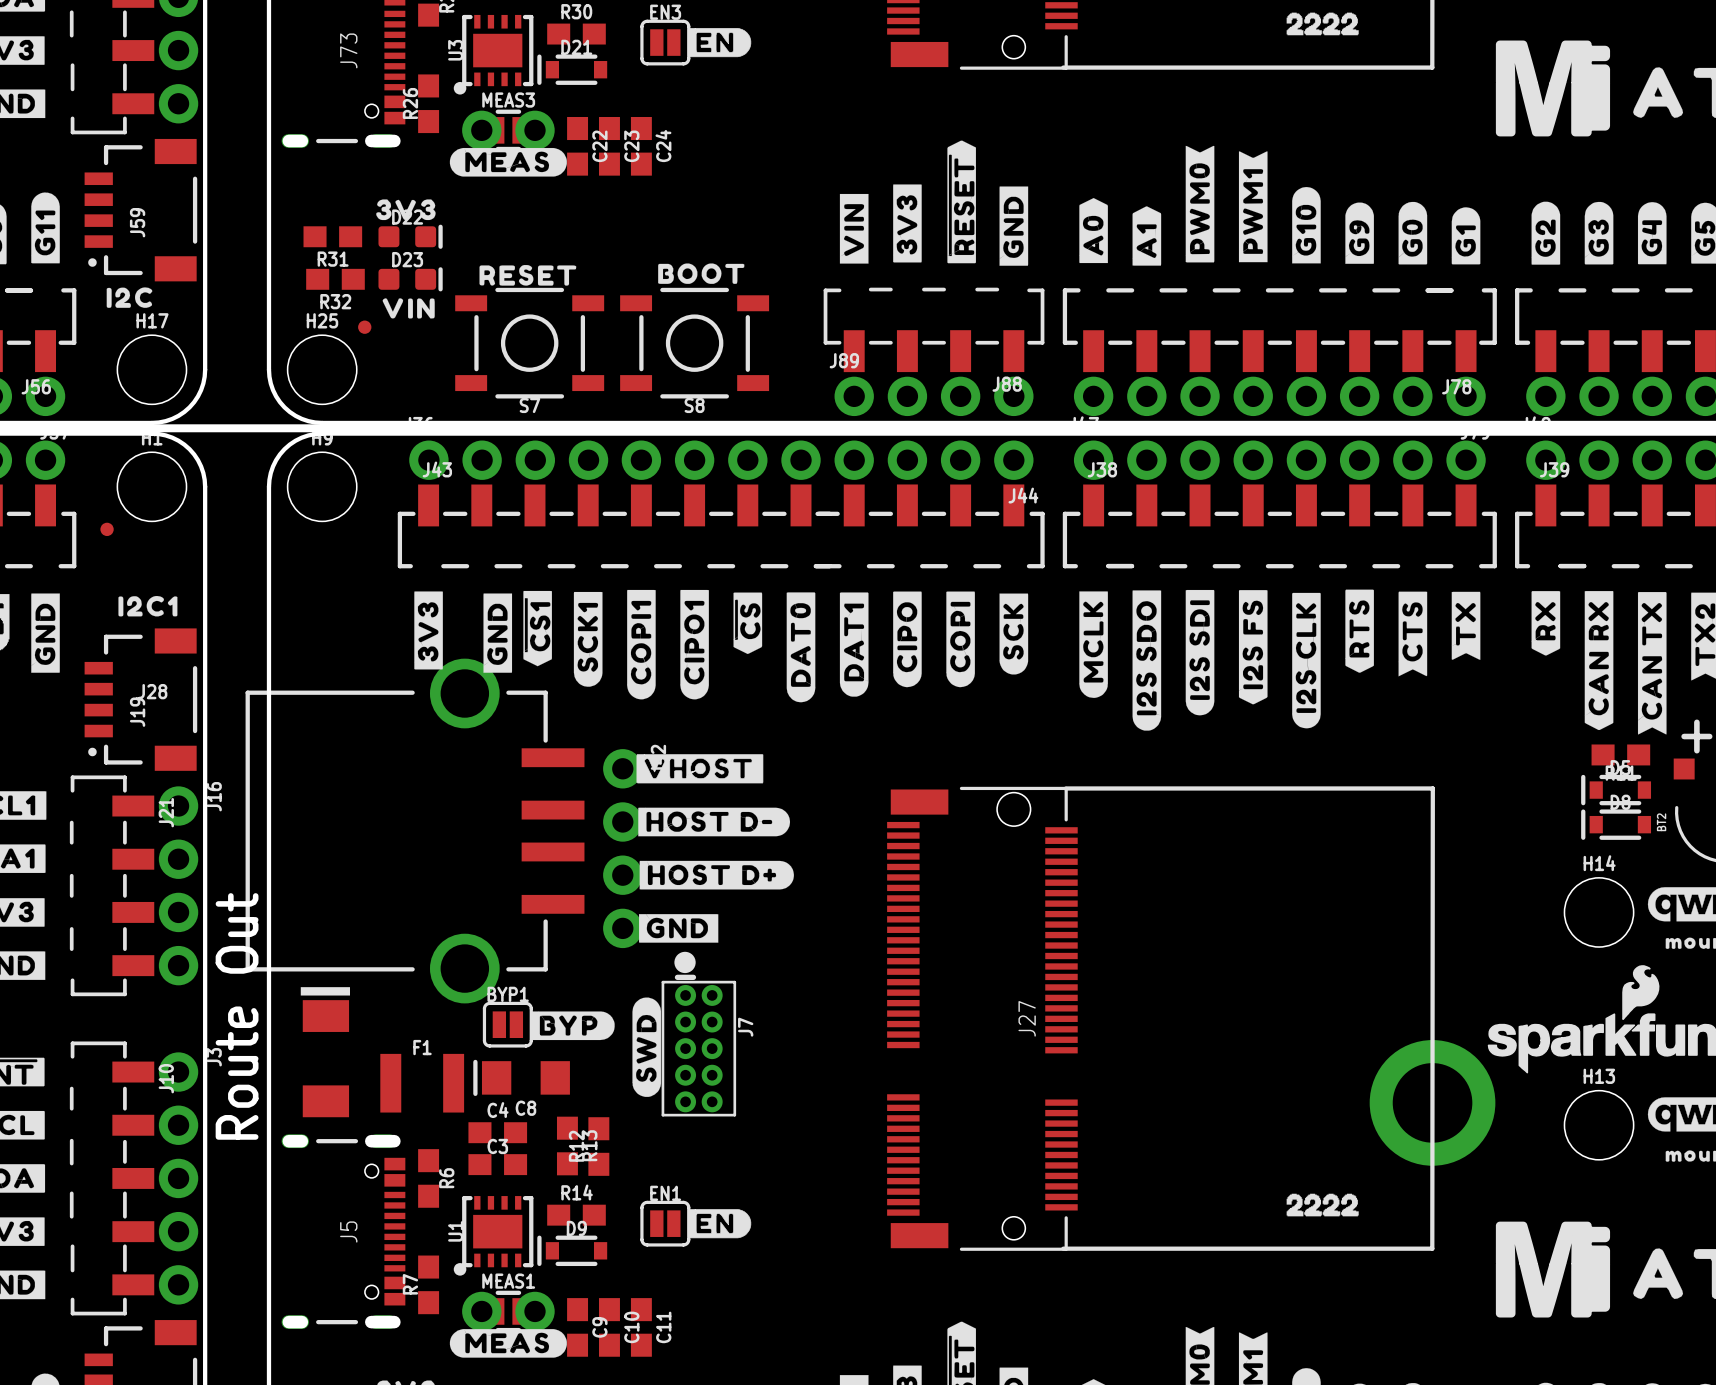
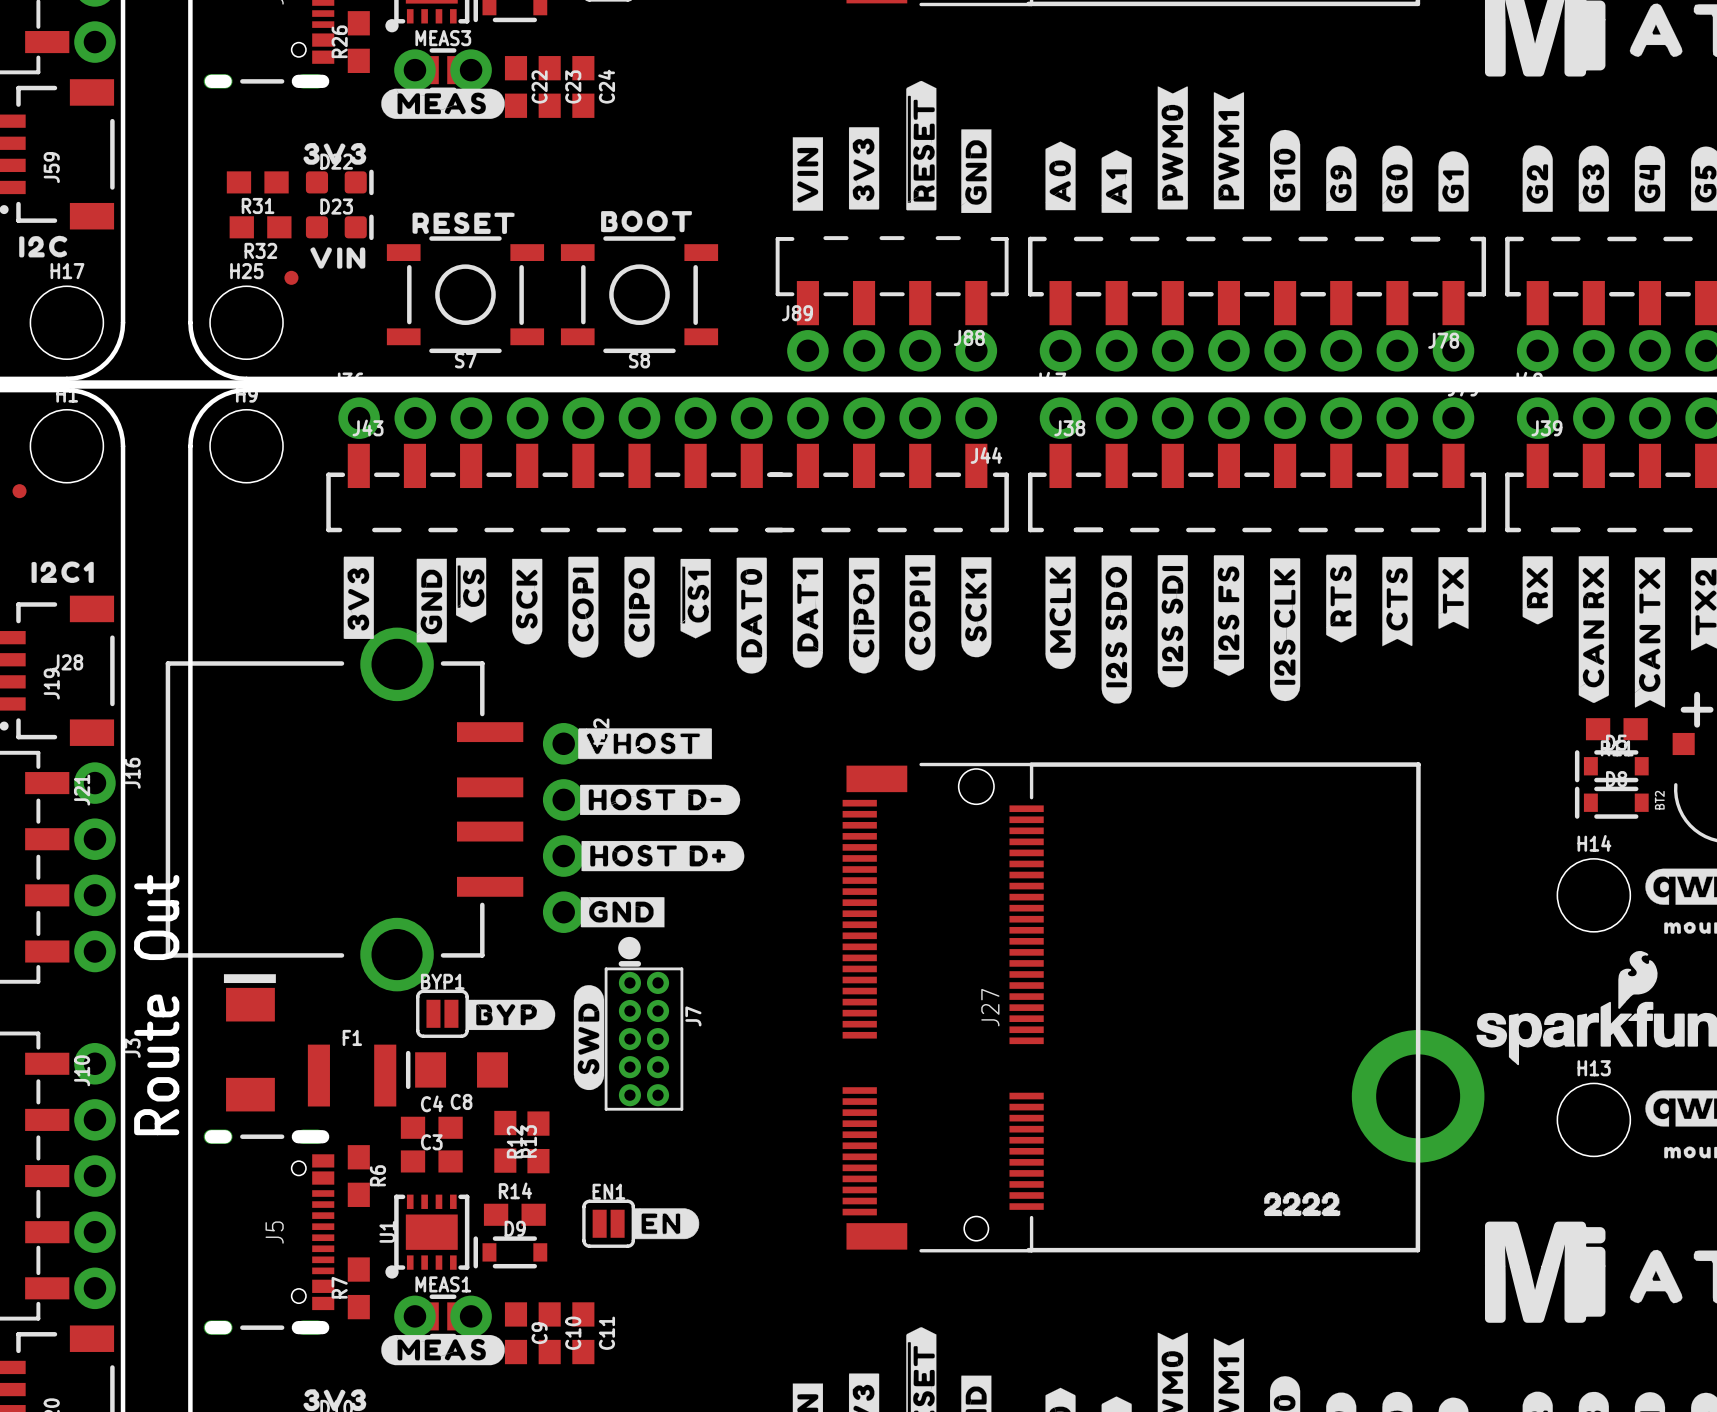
drawing position: (747, 623) -> (471, 590)
drawing position: (537, 628) -> (695, 598)
drawing position: (1013, 634) -> (527, 601)
drawing position: (588, 639) -> (976, 607)
drawing position: (907, 639) -> (639, 607)
drawing position: (960, 639) -> (583, 607)
drawing position: (641, 644) -> (920, 612)
drawing position: (694, 644) -> (864, 615)

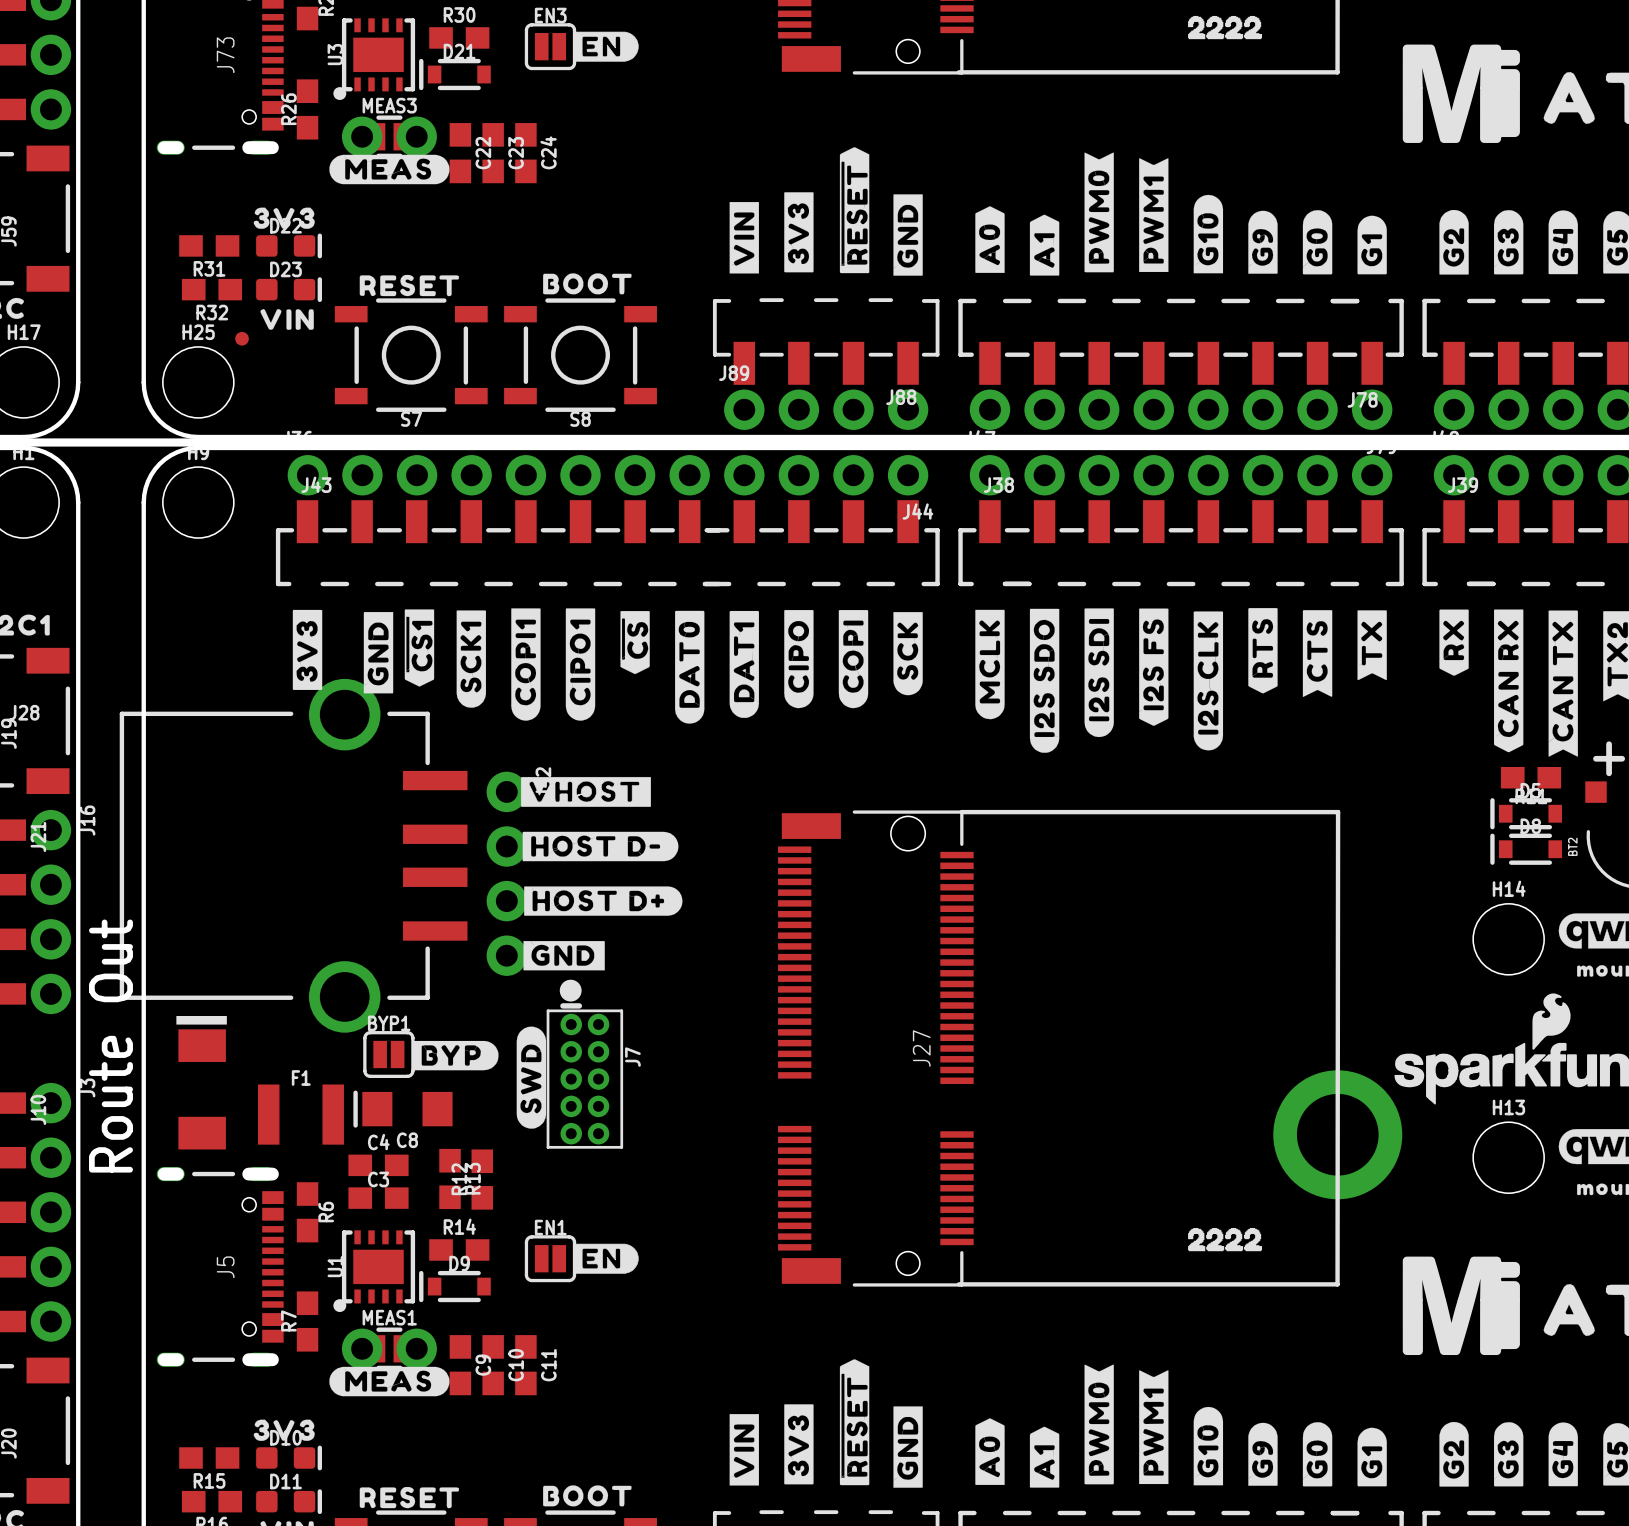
drawing position: (471, 590) -> (635, 642)
drawing position: (695, 598) -> (419, 648)
drawing position: (527, 601) -> (908, 653)
drawing position: (583, 607) -> (853, 659)
drawing position: (639, 607) -> (798, 659)
drawing position: (976, 607) -> (471, 659)
drawing position: (920, 612) -> (525, 664)
drawing position: (864, 615) -> (580, 664)

